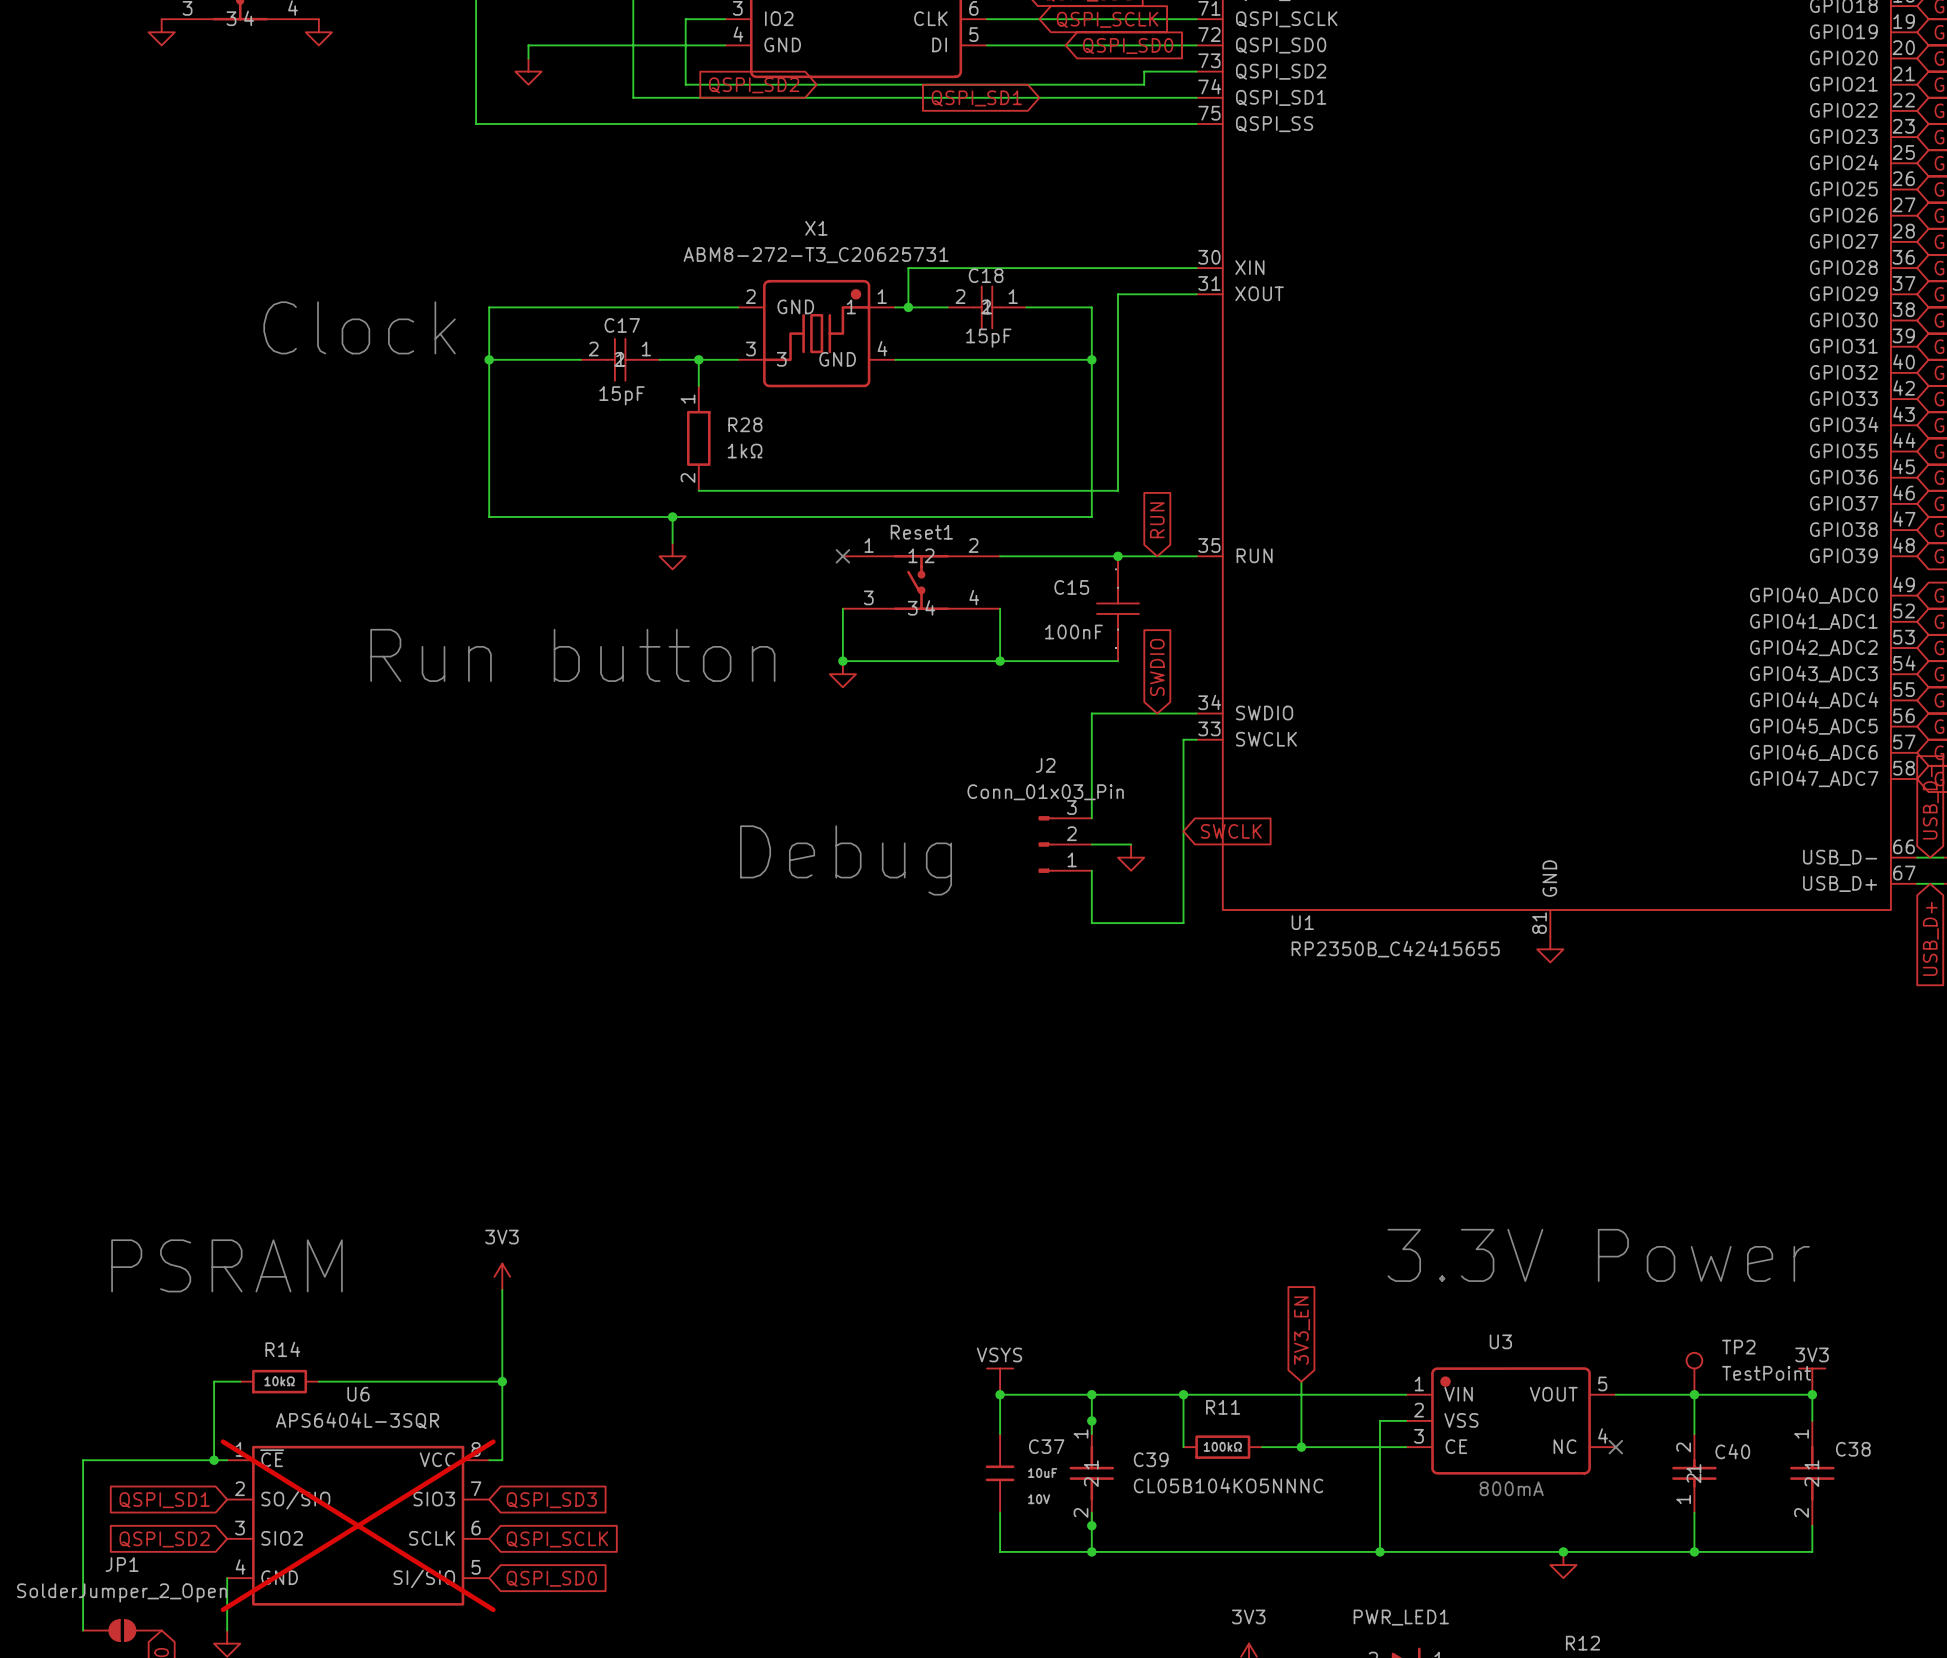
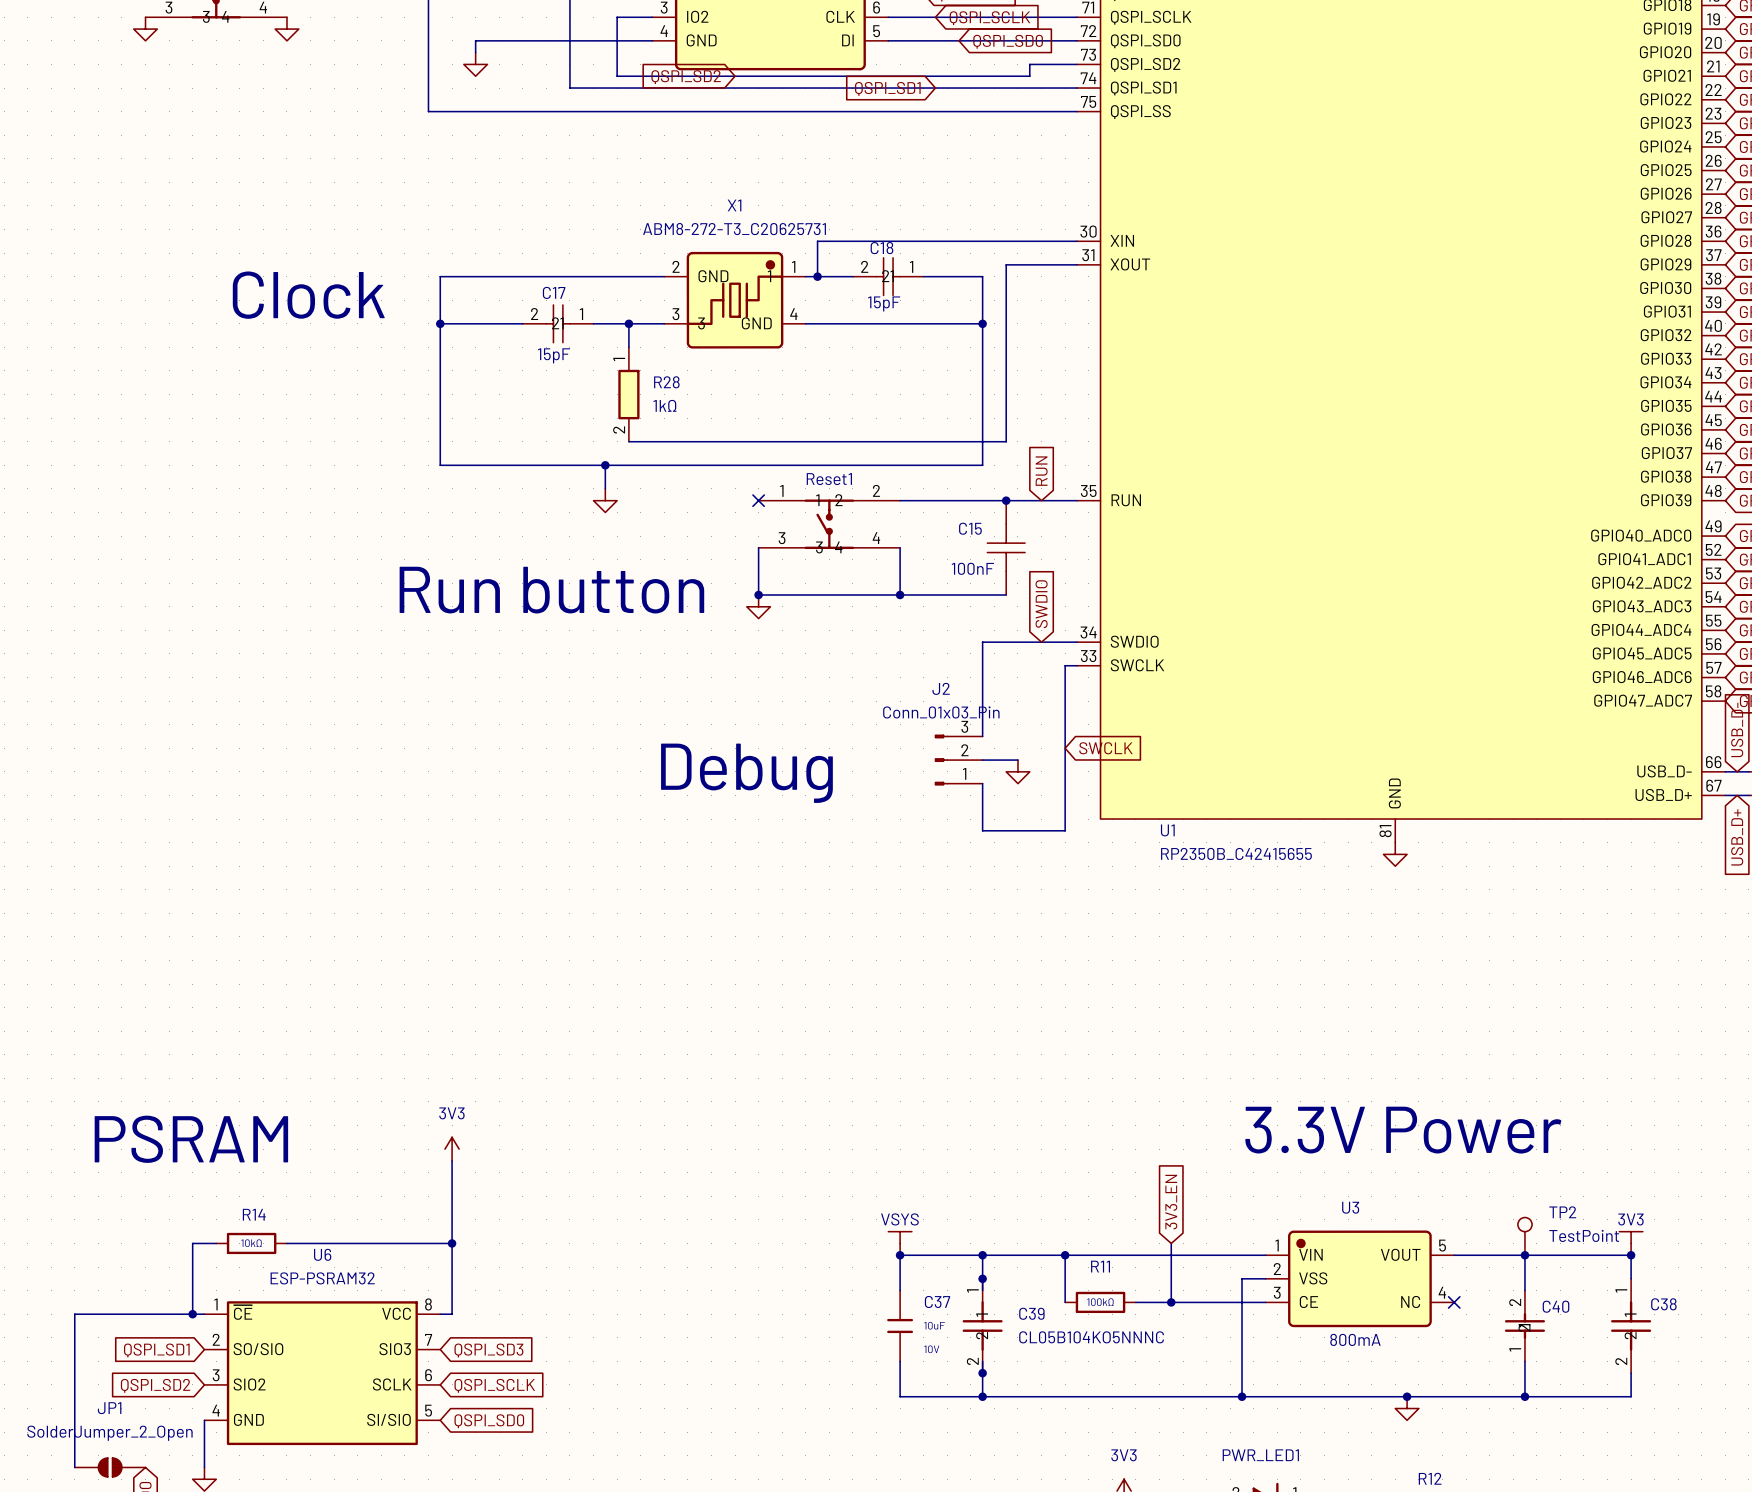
U6 value: APS6404L-3SQR (357, 1420) -> ESP-PSRAM32 (322, 1278)
U6 do-not-place cross: (358, 1525) -> none

